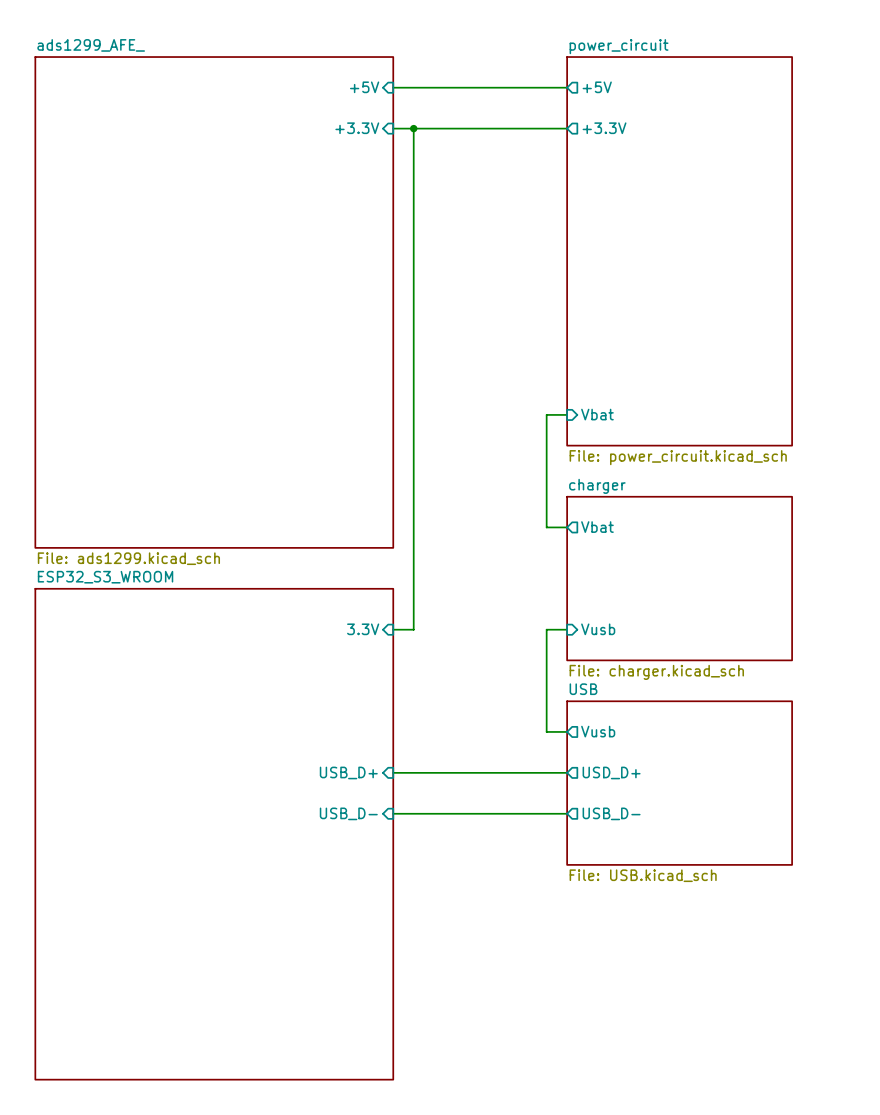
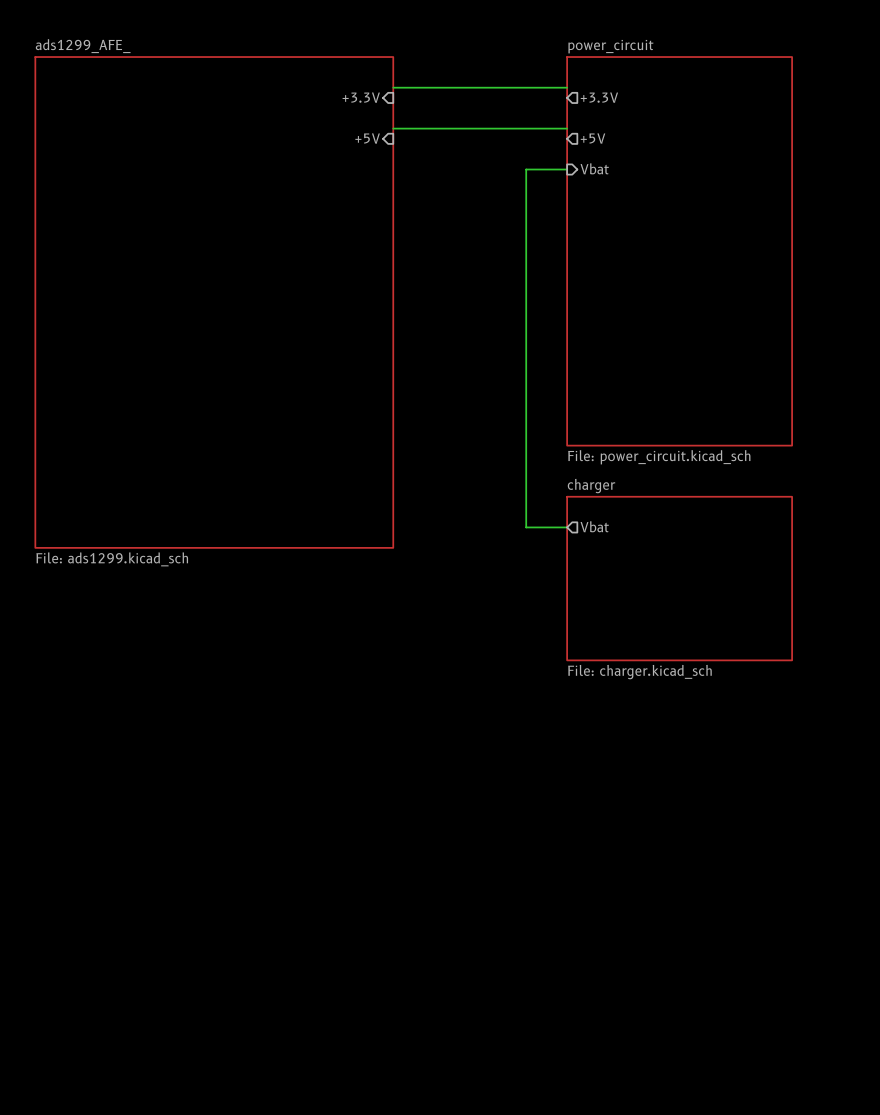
sheet pin position: +5V (364, 87) -> +5V (367, 138)
sheet pin position: +5V (597, 87) -> +5V (593, 138)
sheet pin position: +3.3V (357, 128) -> +3.3V (361, 97)
wire: (413, 128) (413, 629) (393, 629) -> none
junction: (413, 128) -> none
sheet pin position: +3.3V (604, 128) -> +3.3V (599, 97)
sheet pin: none -> Vbat (594, 168)
wire: (567, 414) (546, 414) (546, 527) -> (567, 169) (526, 169) (526, 527) (546, 527)
sheet pin: Vbat (597, 414) -> none
sheet pin: 3.3V (363, 629) -> none
wire: (567, 629) (546, 629) (546, 731) (567, 731) -> none
sheet pin: Vusb (598, 629) -> none
sheet pin: Vusb (598, 731) -> none
sheet pin: USB_D+ (348, 772) -> none
wire: (393, 772) (567, 772) -> none
sheet pin: USD_D+ (611, 772) -> none
sheet USB: File: USB.kicad_sch (679, 783) -> none
sheet pin: USB_D- (348, 813) -> none
wire: (393, 813) (567, 813) -> none
sheet pin: USB_D- (611, 813) -> none
sheet ESP32_S3_WROOM: (214, 834) -> none

